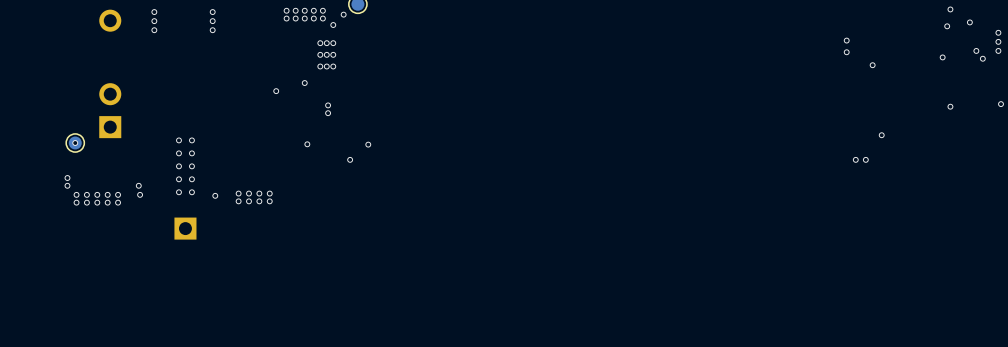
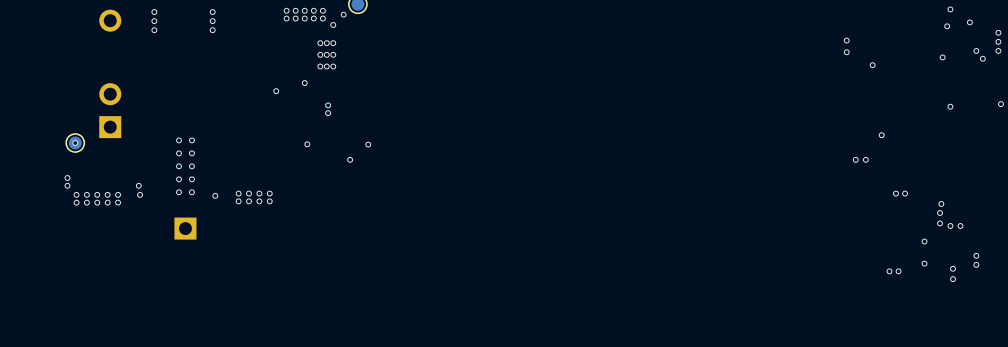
via: none -> (895, 193)
via: none -> (905, 193)
via: none -> (941, 203)
via: none -> (940, 213)
via: none -> (940, 223)
via: none -> (950, 225)
via: none -> (960, 225)
via: none -> (924, 241)
via: none -> (976, 255)
via: none -> (924, 263)
via: none -> (976, 264)
via: none -> (953, 268)
via: none -> (889, 271)
via: none -> (898, 271)
via: none -> (953, 279)

